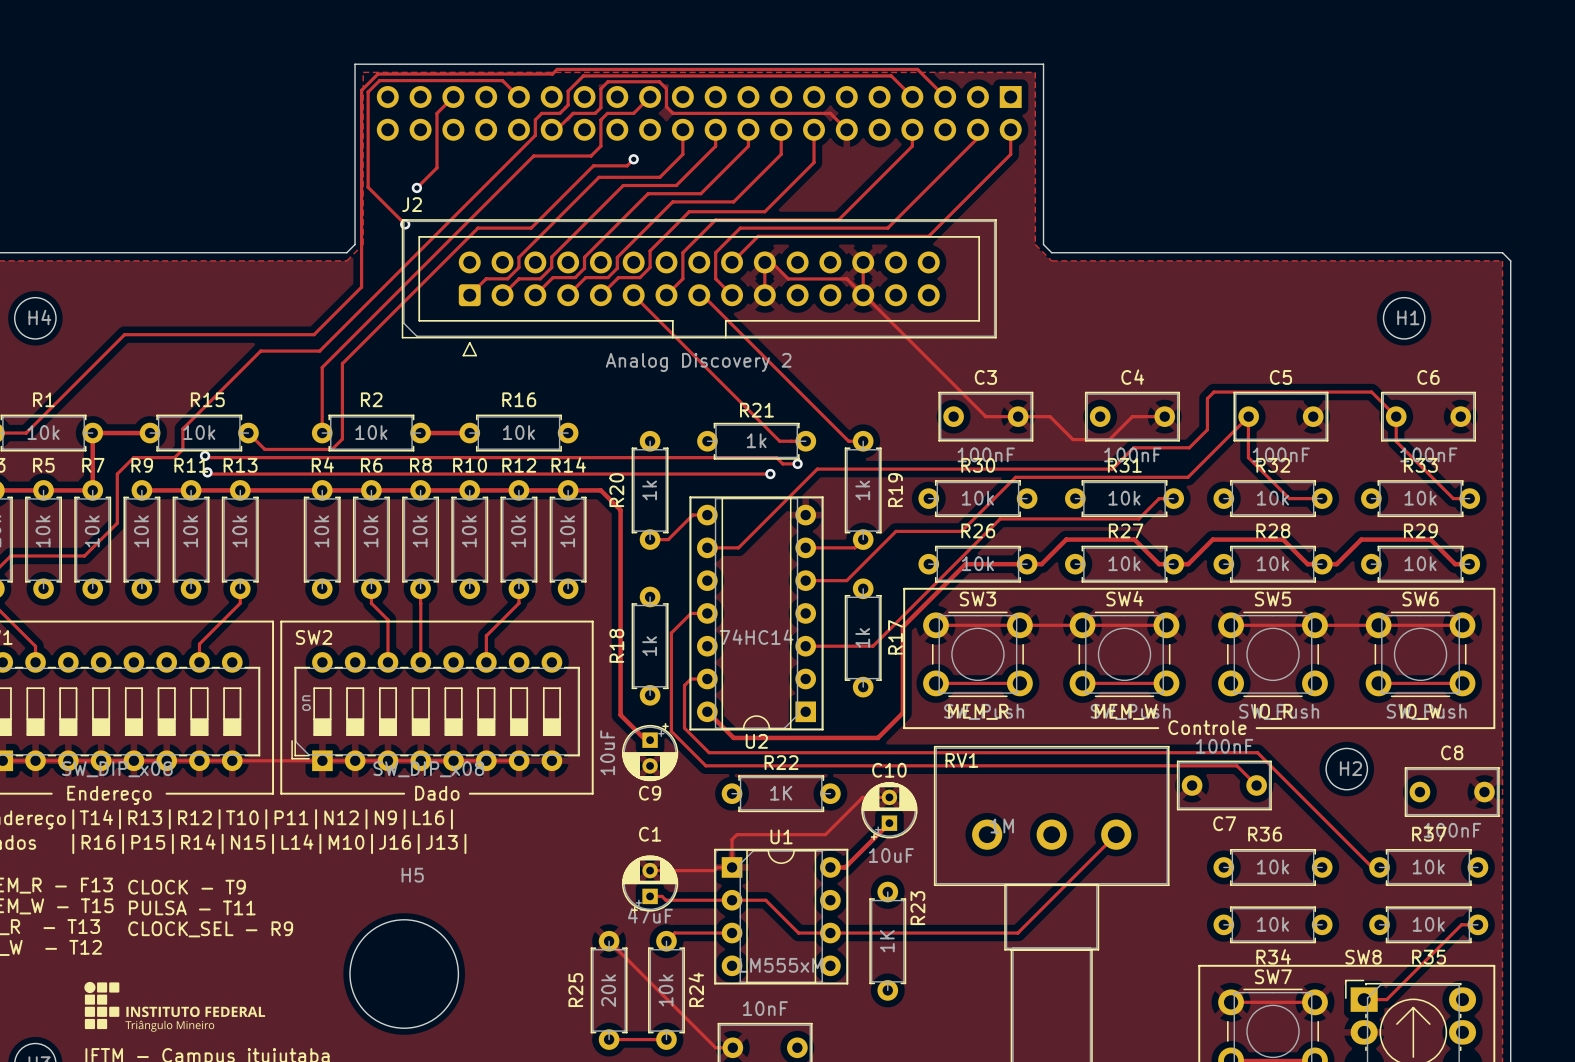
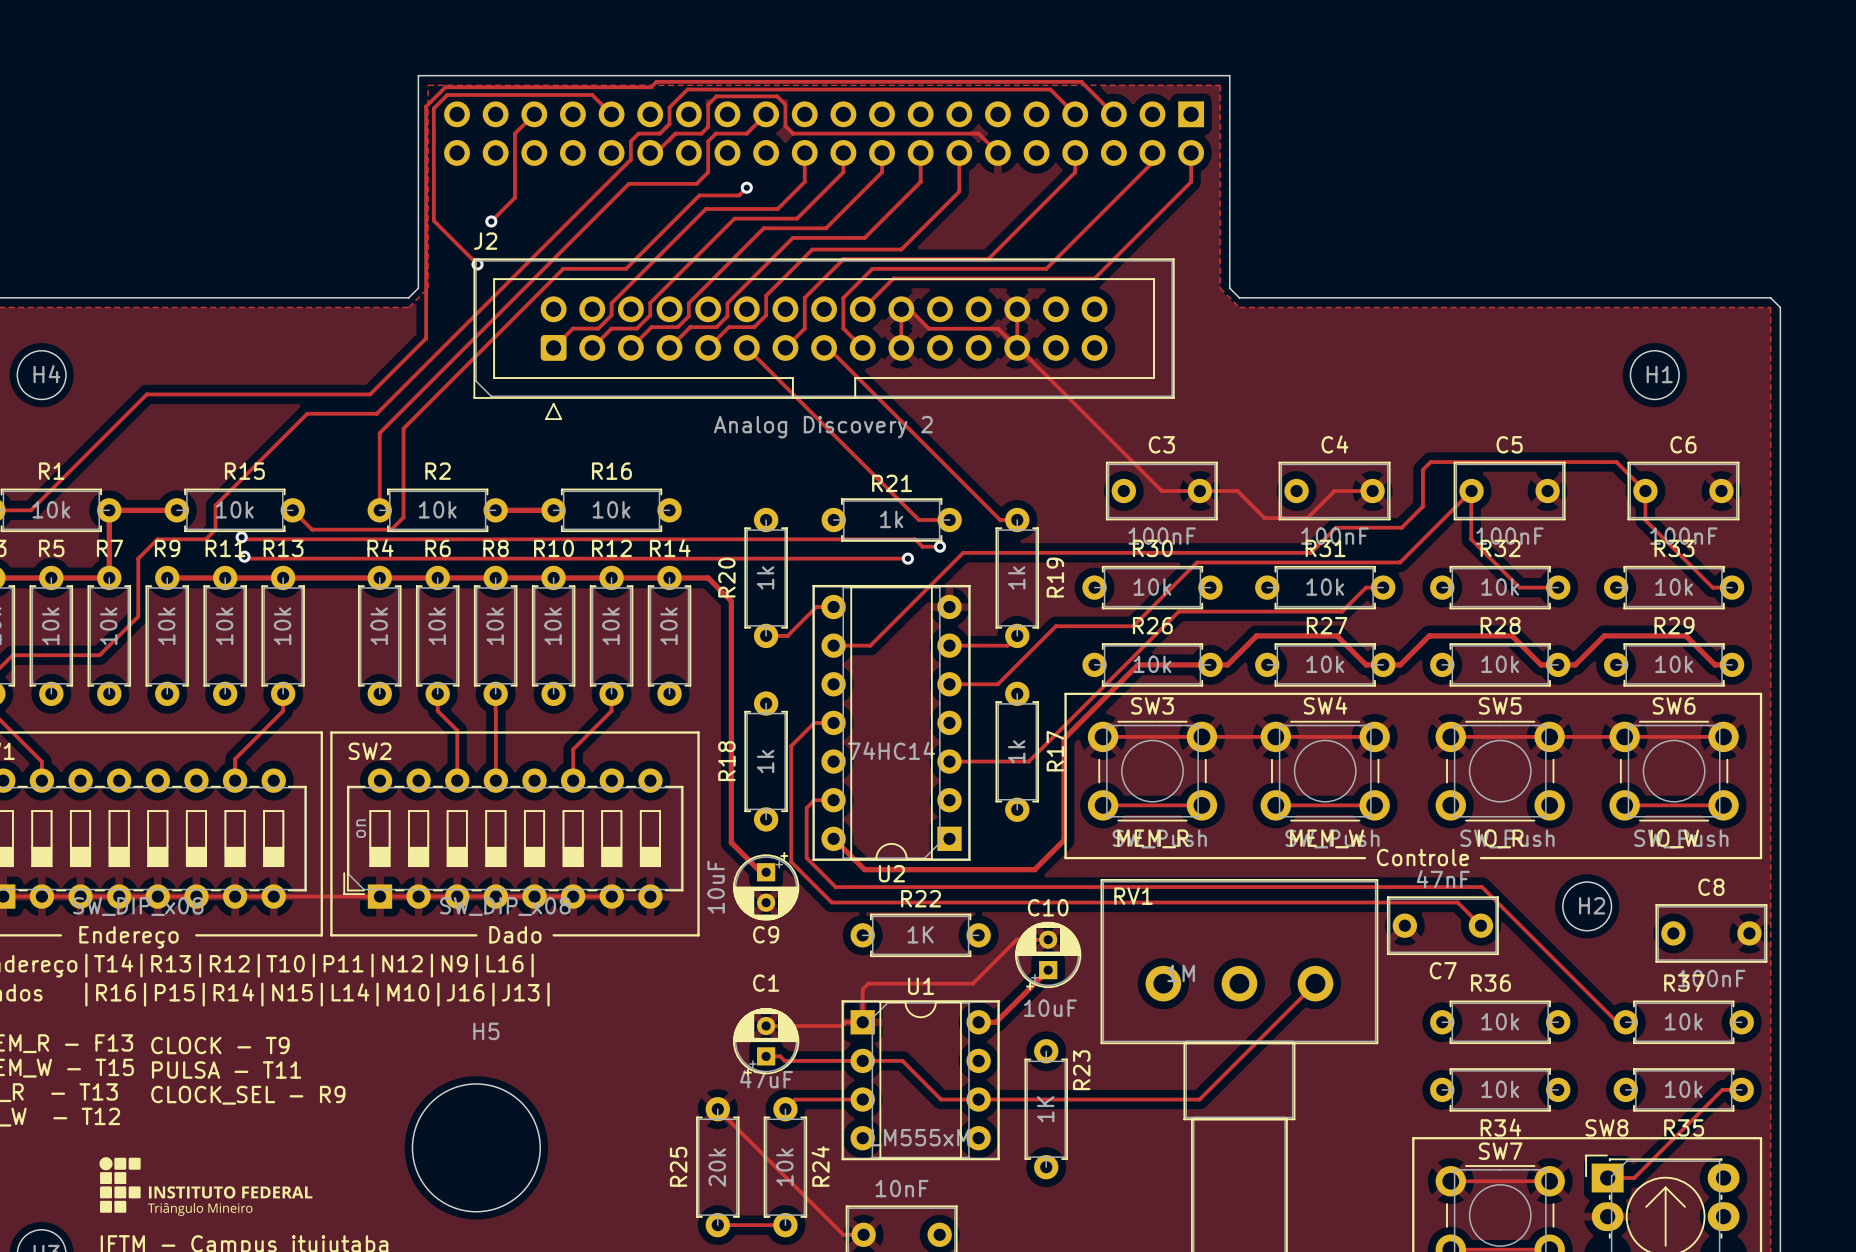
C7 value: 100nF (1224, 746) -> 47nF (1443, 879)

